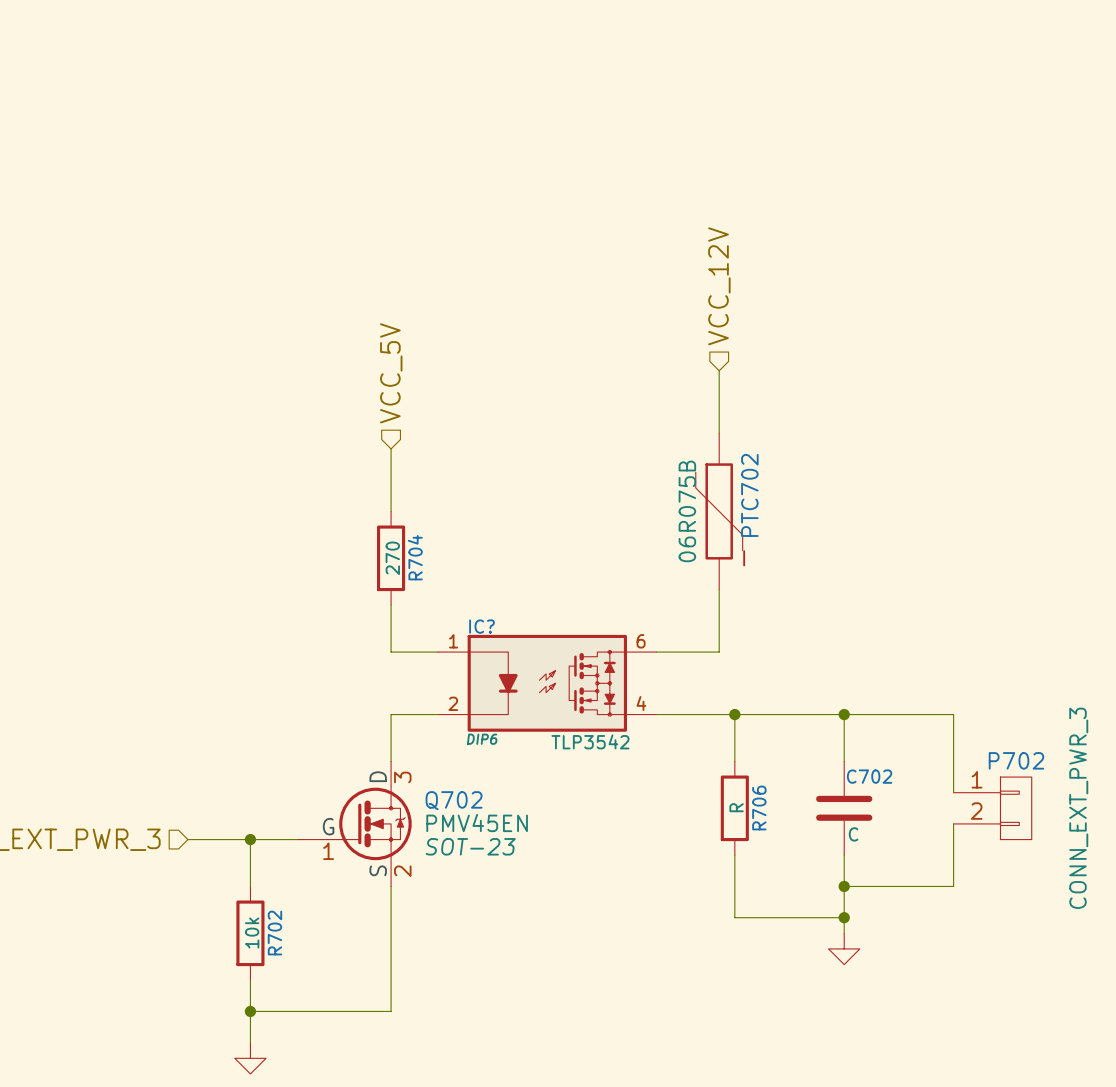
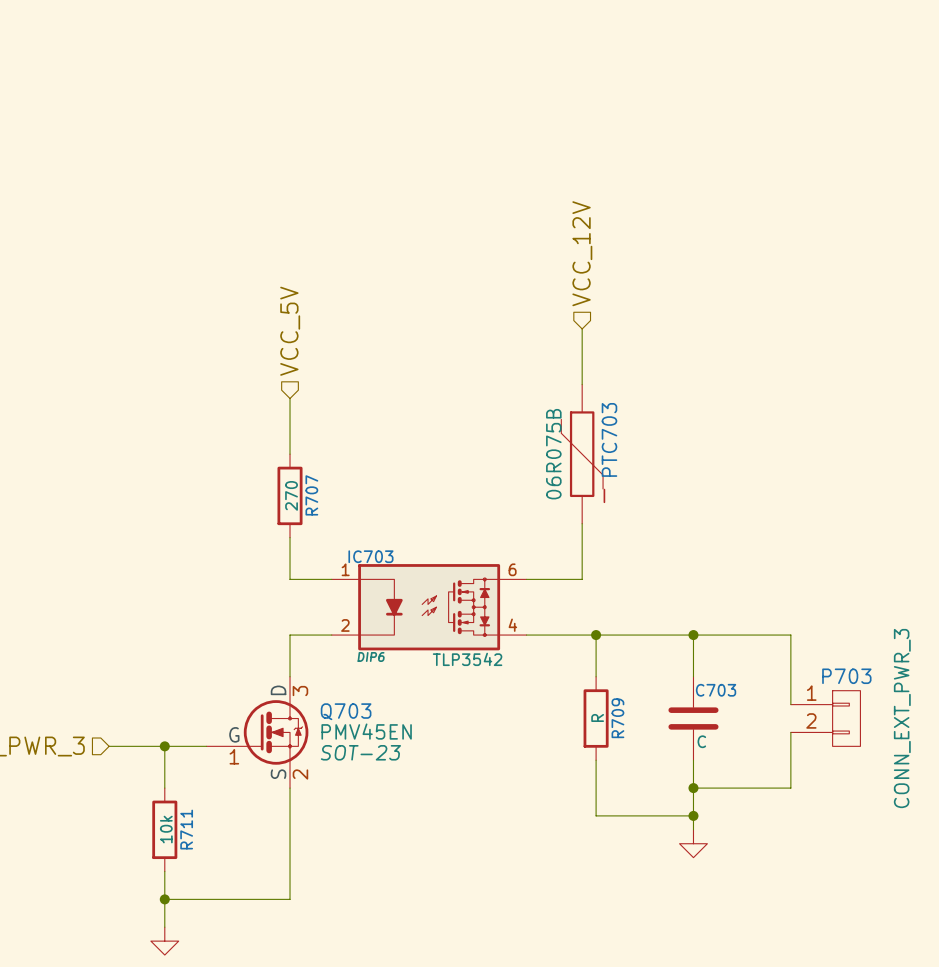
PTC702 name: PTC702 (749, 495) -> PTC703 (609, 439)
R704 name: R704 (415, 557) -> R707 (311, 495)
IC? name: IC? (481, 626) -> IC703 (370, 556)
P702 name: P702 (1016, 760) -> P703 (846, 676)
C702 name: C702 (869, 776) -> C703 (716, 690)
Q702 name: Q702 (454, 800) -> Q703 (346, 711)
R706 name: R706 (759, 808) -> R709 (617, 718)
R702 name: R702 (274, 933) -> R711 (186, 829)

